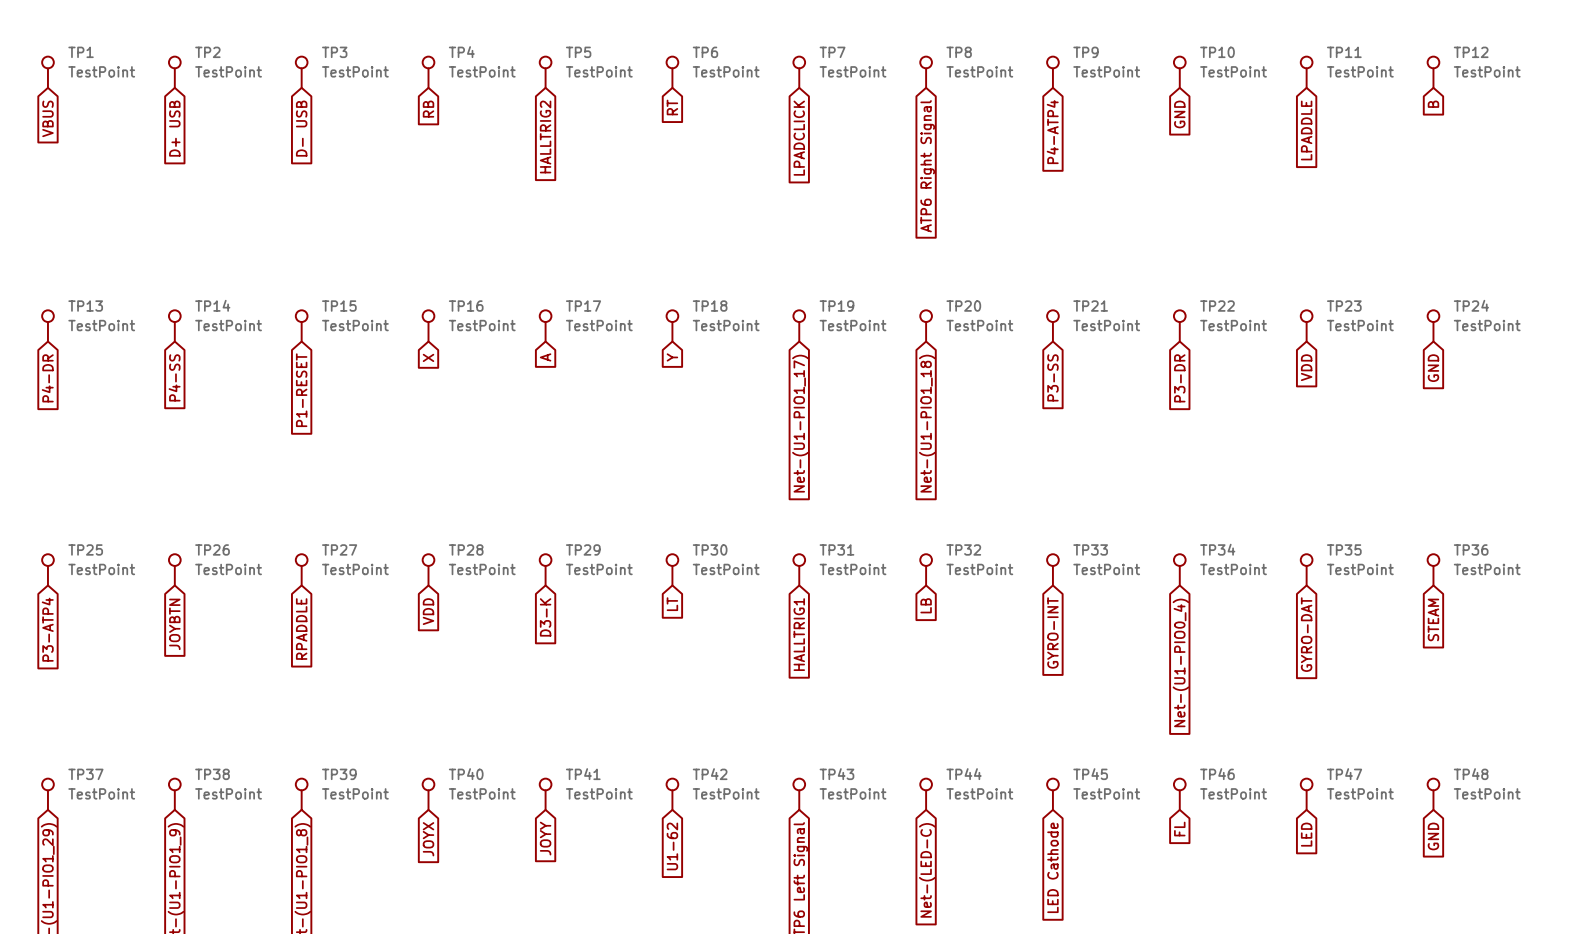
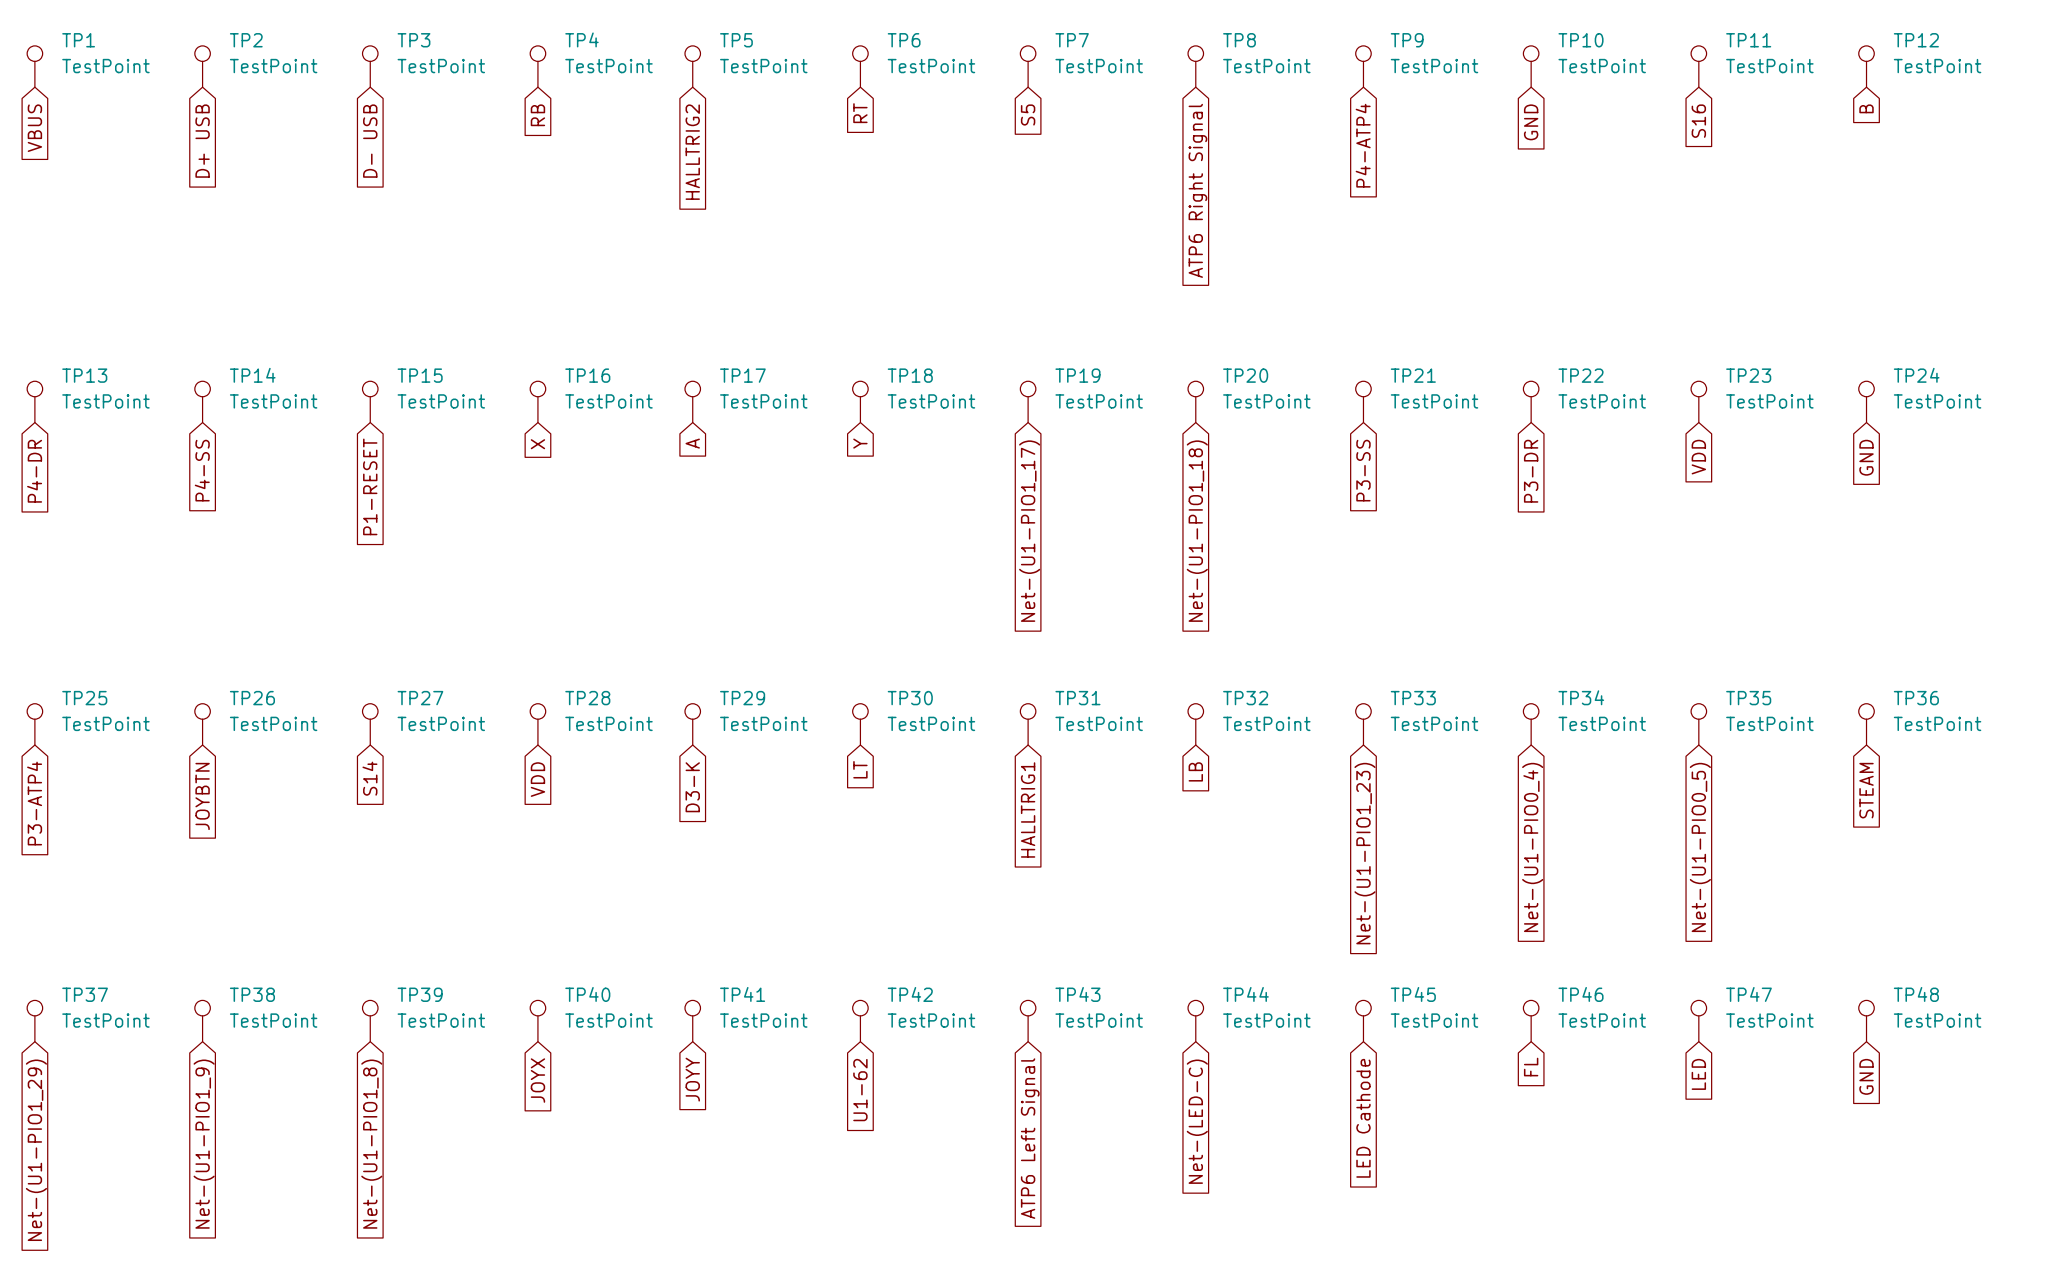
global label: LPADDLE (1306, 130) -> S16 (1698, 121)
global label: LPADCLICK (799, 138) -> S5 (1028, 114)
global label: RPADDLE (301, 629) -> S14 (369, 778)
global label: GYRO-INT (1052, 632) -> Net-(U1-PIO1_23) (1365, 853)
global label: GYRO-DAT (1306, 634) -> Net-(U1-PIO0_5) (1700, 847)

